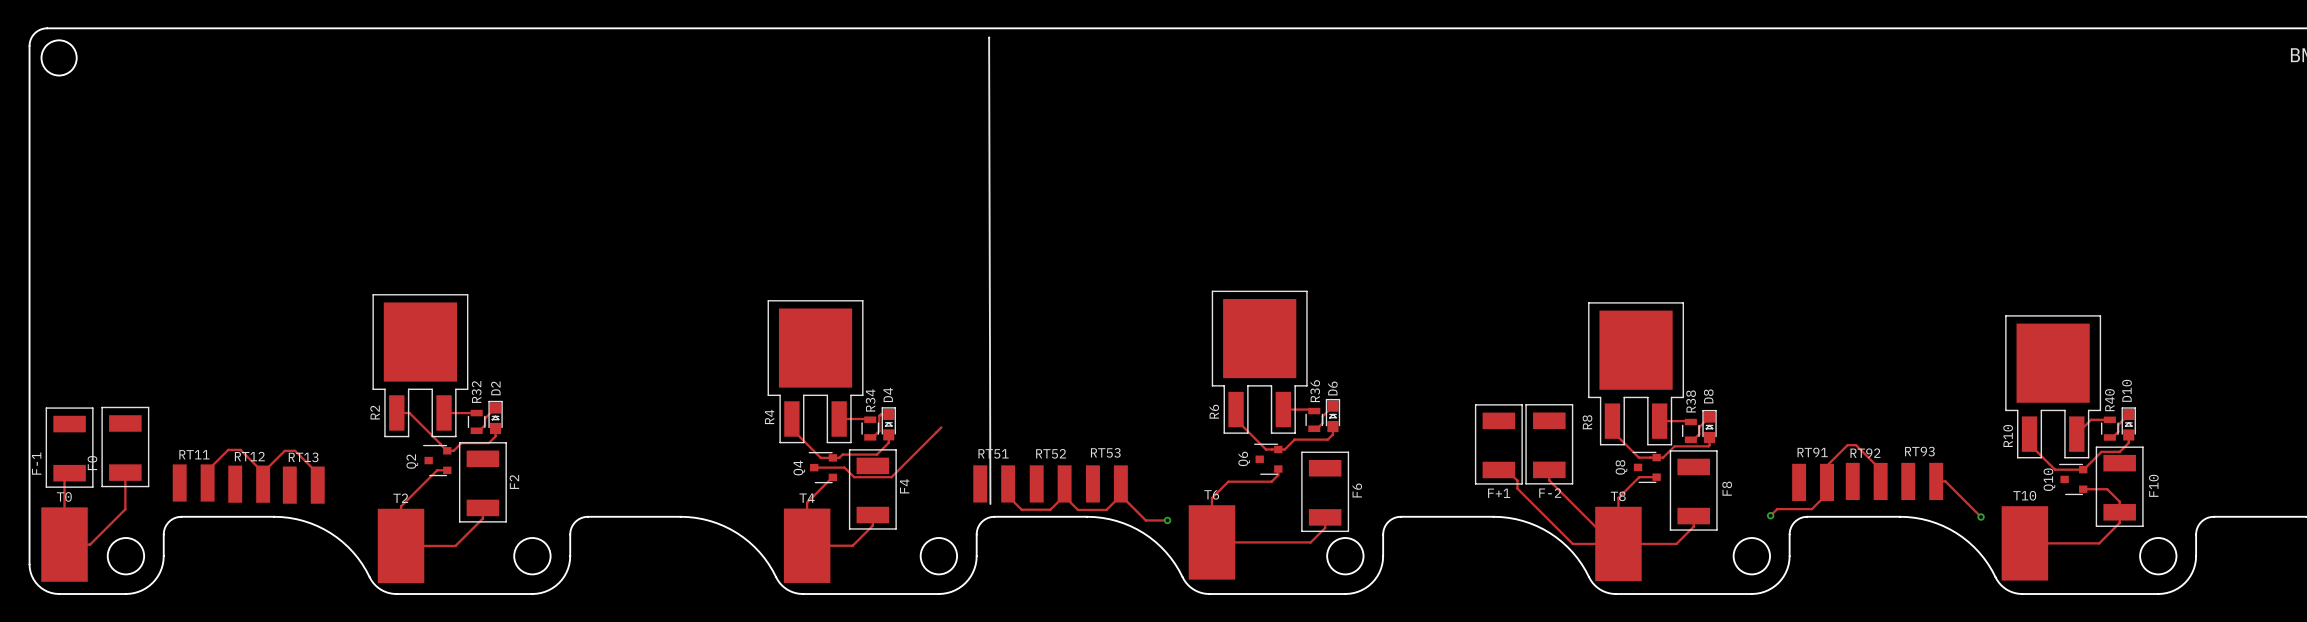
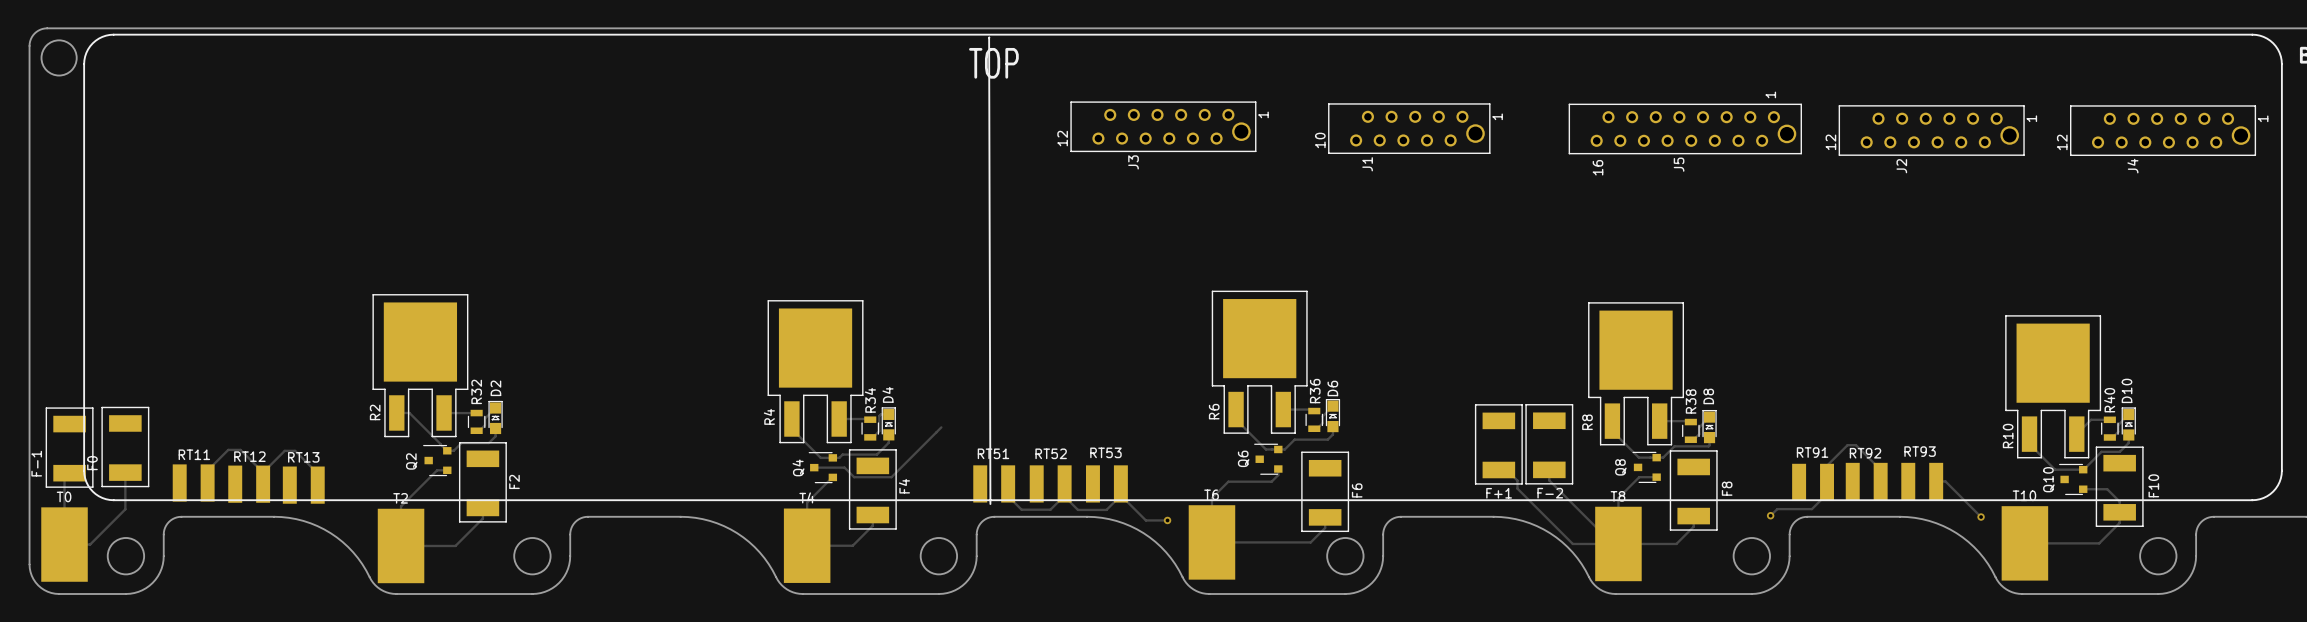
line: none -> (113, 34) (2260, 35) (2267, 38) (2275, 46) (2280, 56) (2281, 64) (2280, 478) (2277, 485) (2270, 494) (2263, 497) (2252, 500) (106, 499) (95, 494) (90, 488) (85, 478) (84, 470) (84, 64) (86, 52) (92, 43) (102, 36) (113, 34)
text: none -> TOP (993, 63)
J3: none -> (1163, 126)
J1: none -> (1409, 128)
J5: none -> (1685, 128)
J2: none -> (1931, 130)
J4: none -> (2163, 130)

